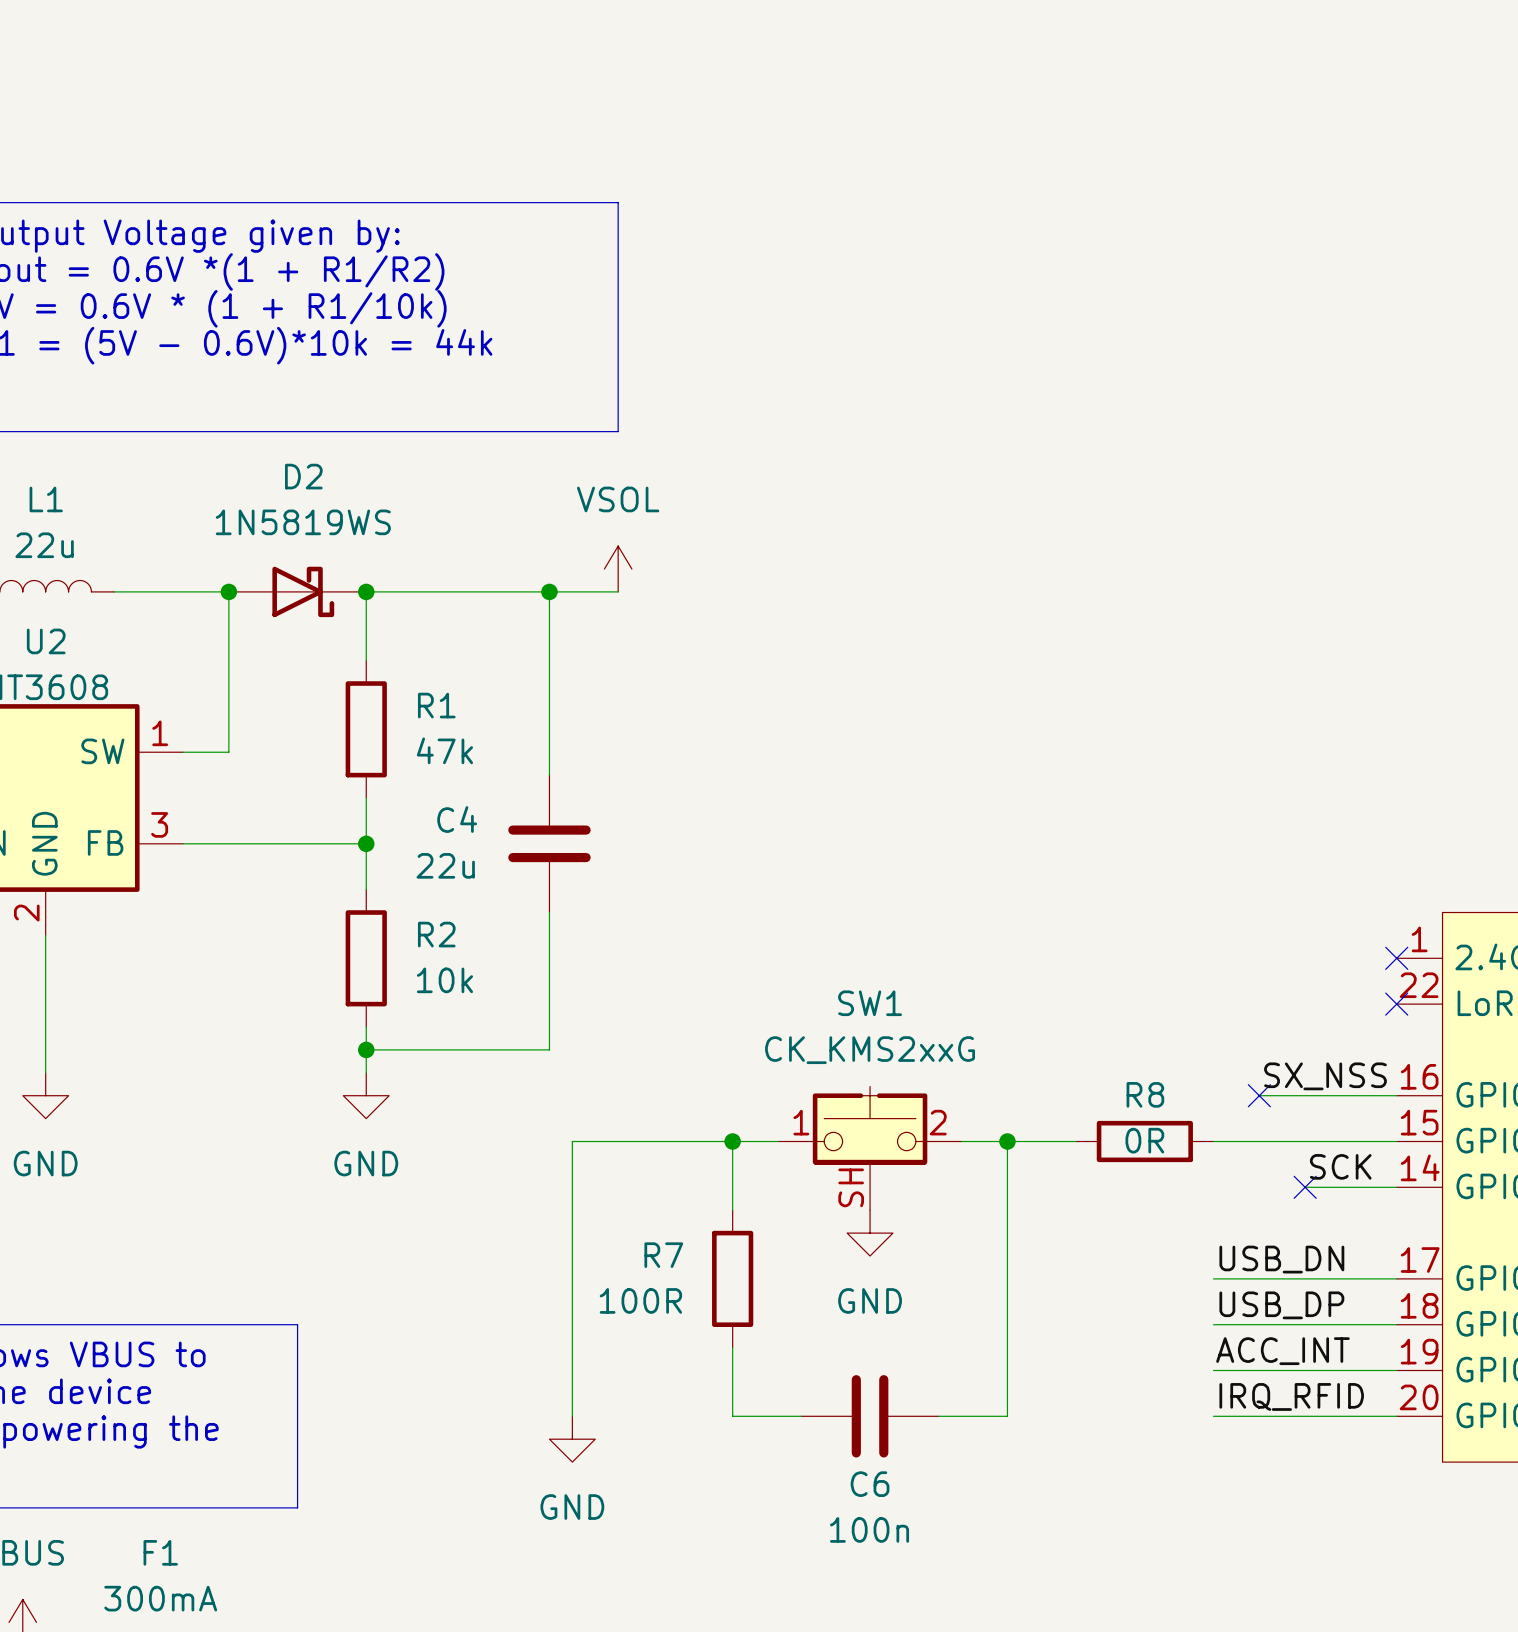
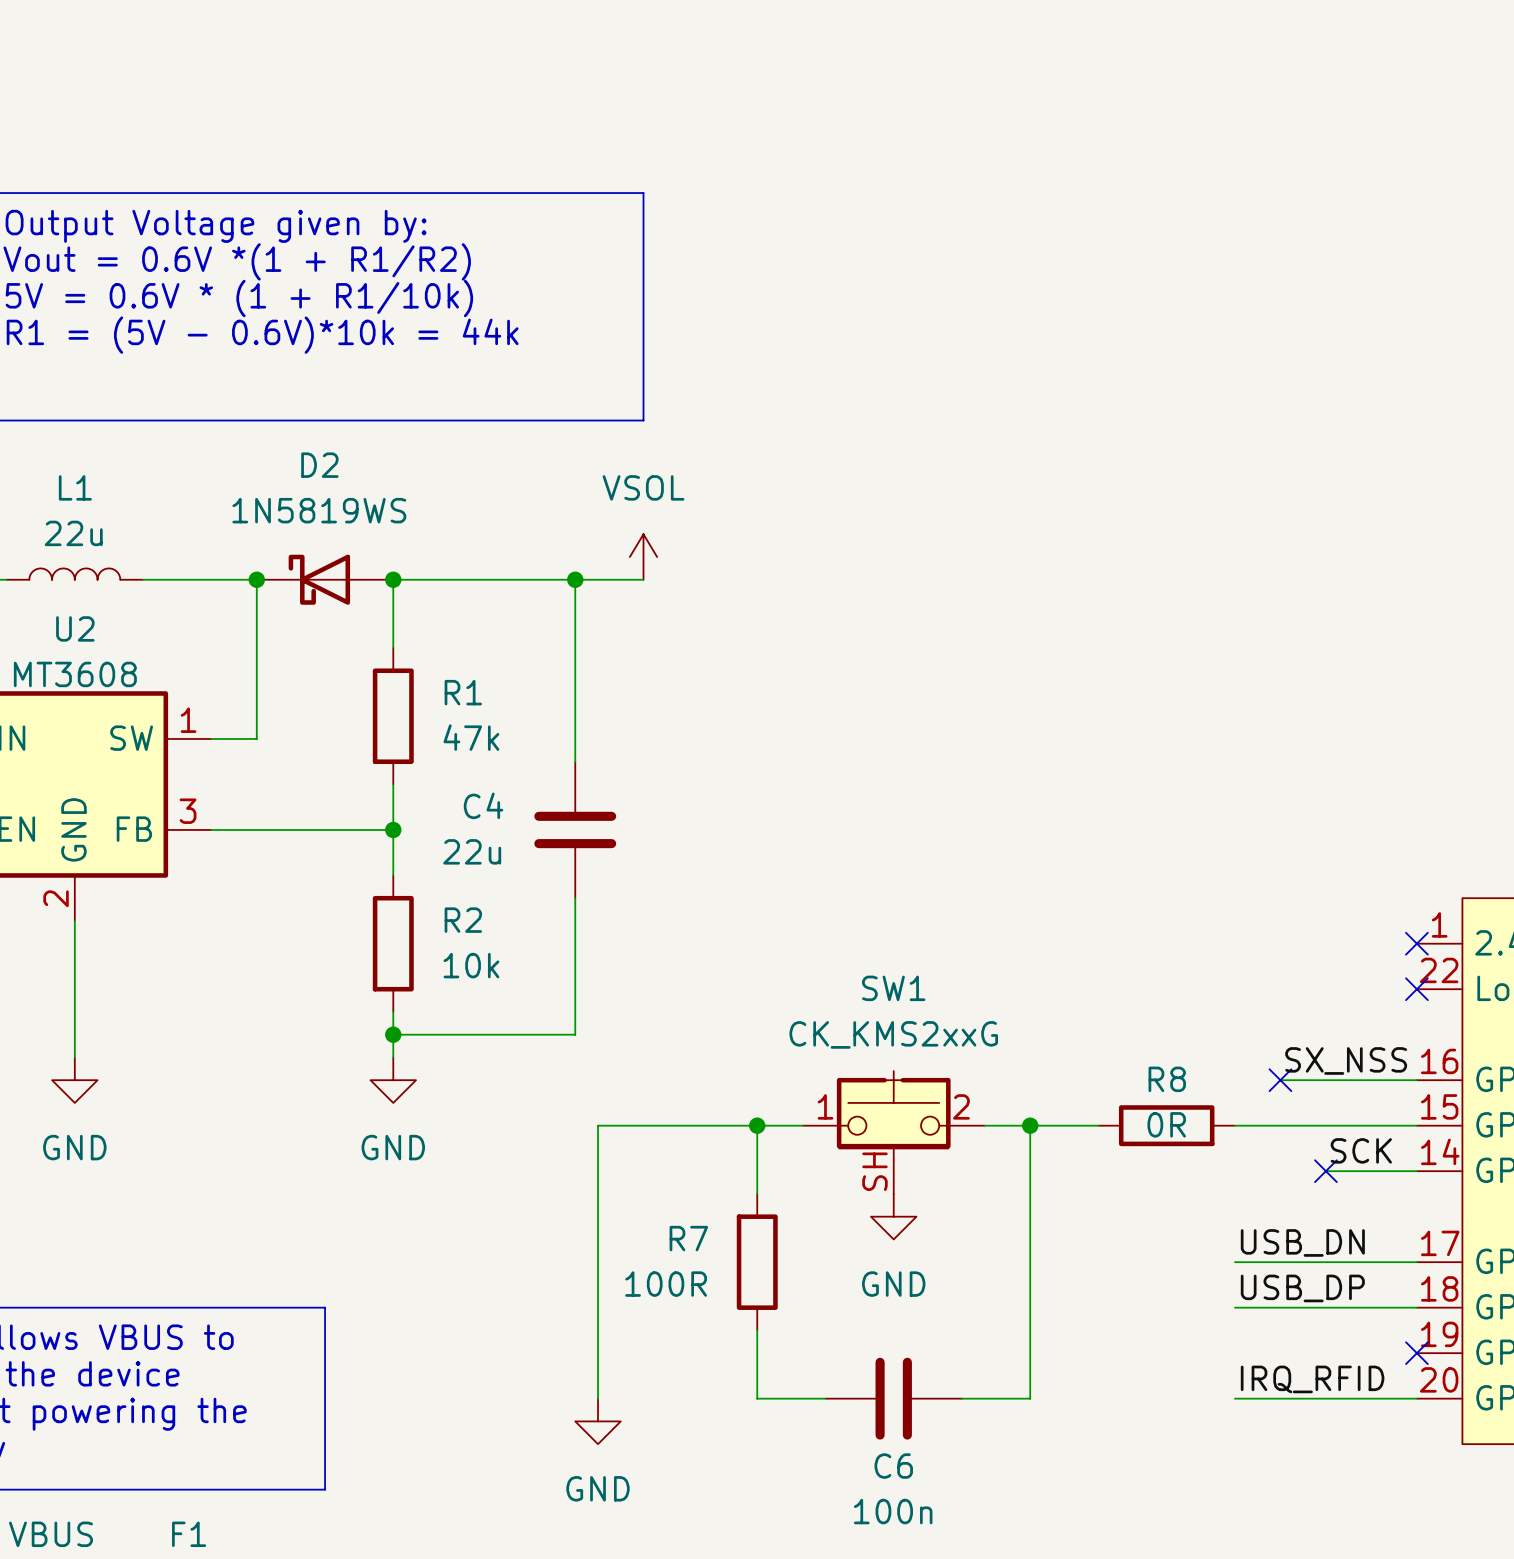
D2 rotation: 0° (303, 591) -> 180° (319, 579)
label: ACC_INT (1282, 1351) -> none
wire: (1213, 1370) (1396, 1370) -> none
no-connect mark: none -> (1416, 1353)

